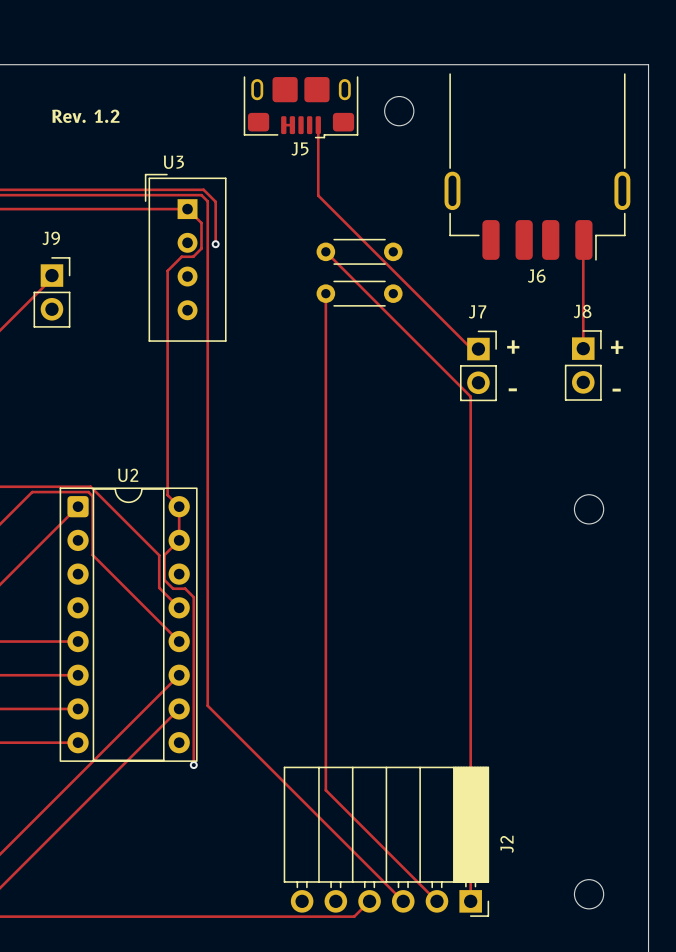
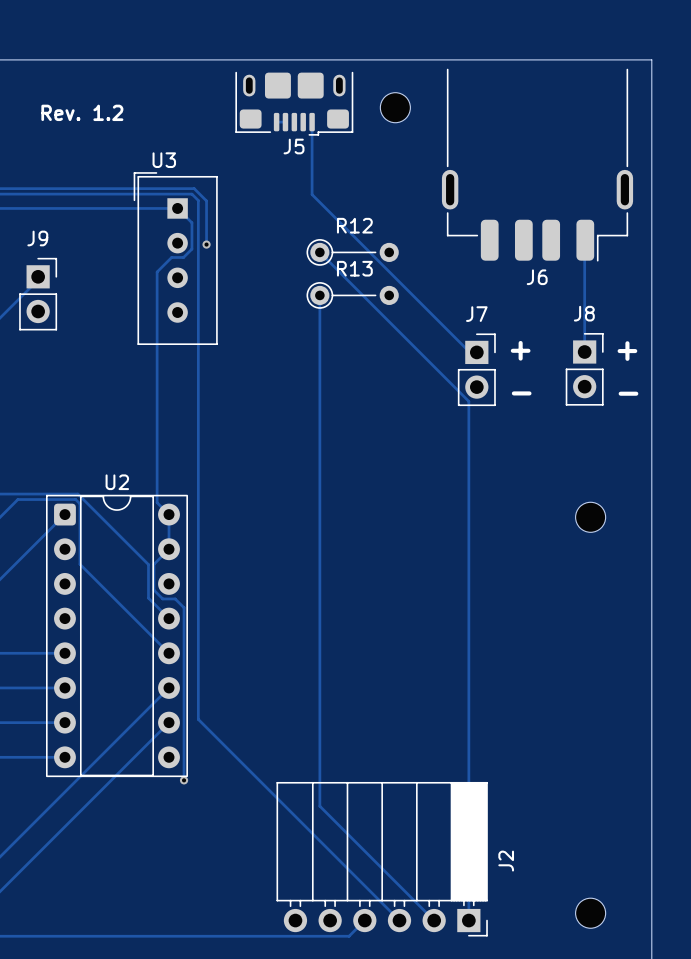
R12: none -> (352, 252)
part: (359, 251) -> none
R13: none -> (352, 295)
part: (359, 293) -> none

